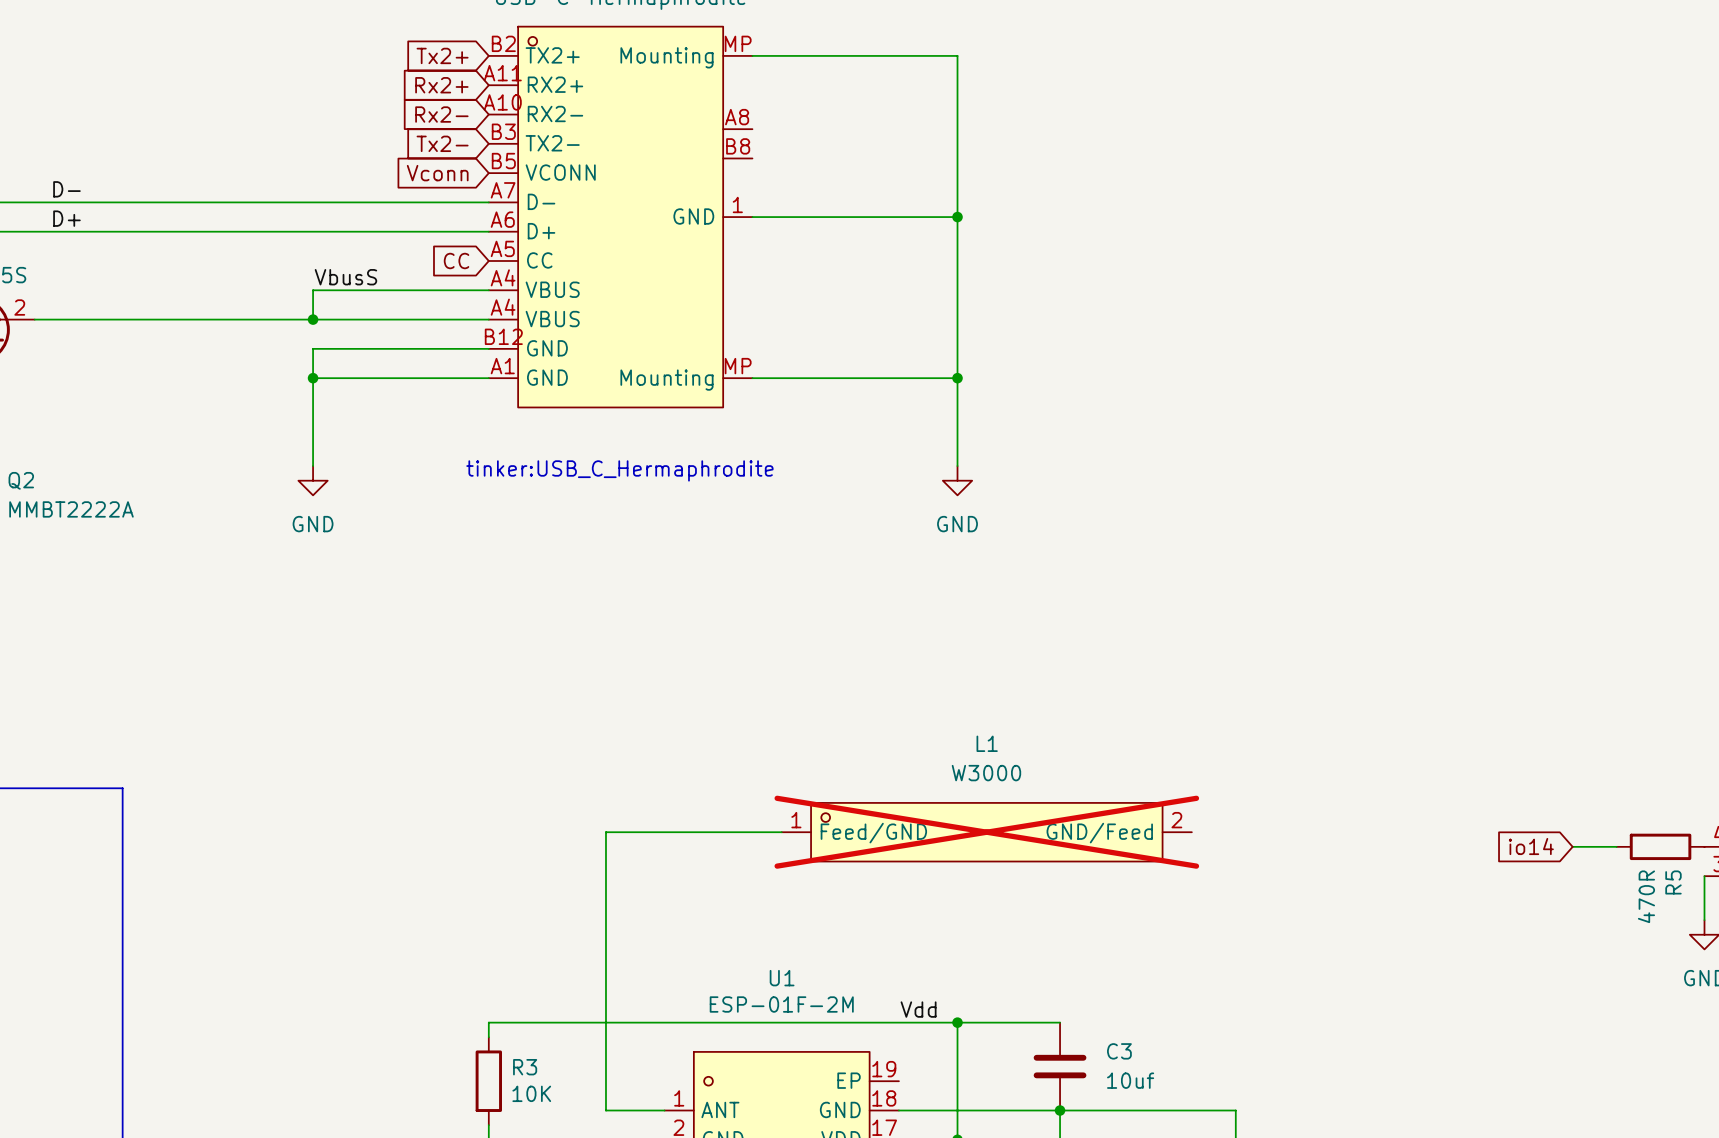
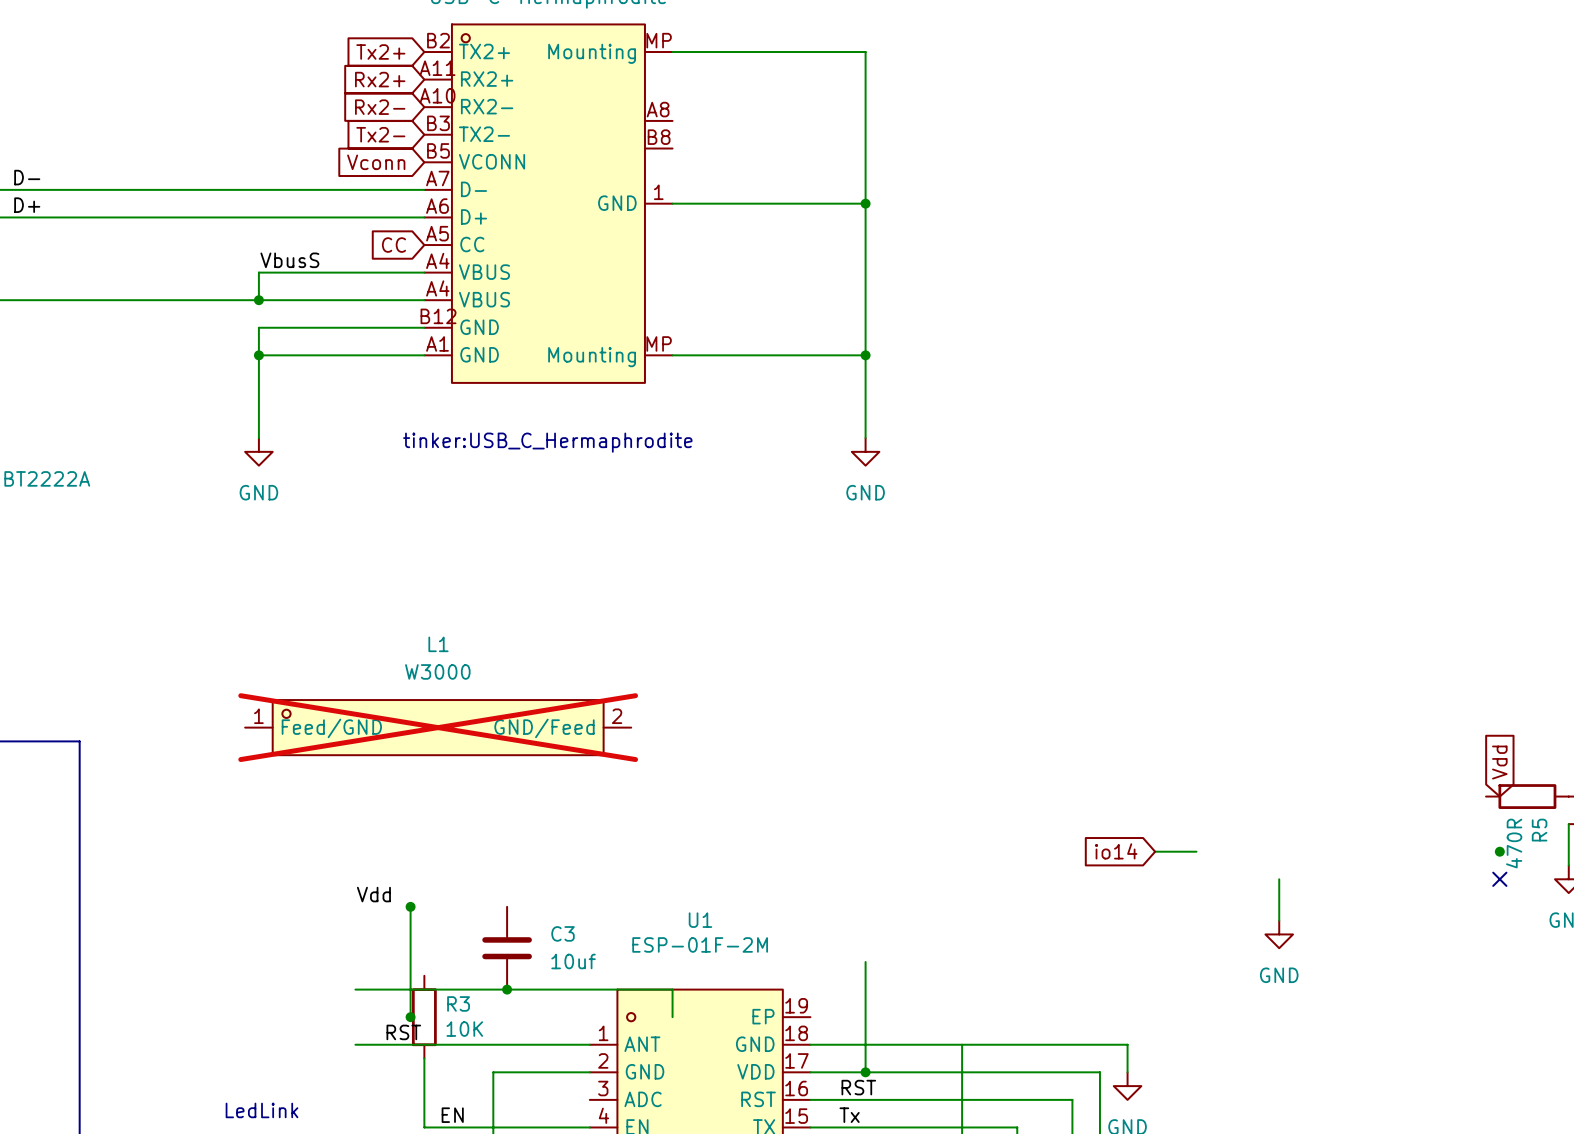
global label: none -> Vdd (1499, 762)
wire: (781, 832) (605, 832) (605, 1110) -> (355, 1044) (534, 1044)
L1 position: (986, 832) -> (438, 727)
global label: io14 (1531, 846) -> none
wire: (1572, 846) (1616, 846) -> none
global label: none -> io14 (1116, 851)
wire: none -> (1155, 851) (1196, 851)
junction: none -> (1499, 851)
wire: none -> (1279, 879) (1279, 920)
no-connect mark: none -> (1499, 879)
label: none -> Vdd (373, 894)
wire: none -> (410, 906) (410, 1017)
junction: none -> (410, 906)
power symbol: none -> GND (1279, 934)
label: Vdd (918, 1009) -> none
junction: (957, 1022) -> none
wire: (1060, 1022) (488, 1022) (488, 1037) -> none
wire: none -> (355, 989) (672, 989) (672, 1017)
junction: none -> (507, 989)
C3 position: (1060, 1066) -> (507, 948)
junction: none -> (410, 1017)
label: none -> RST (403, 1032)
junction: (1060, 1110) -> none

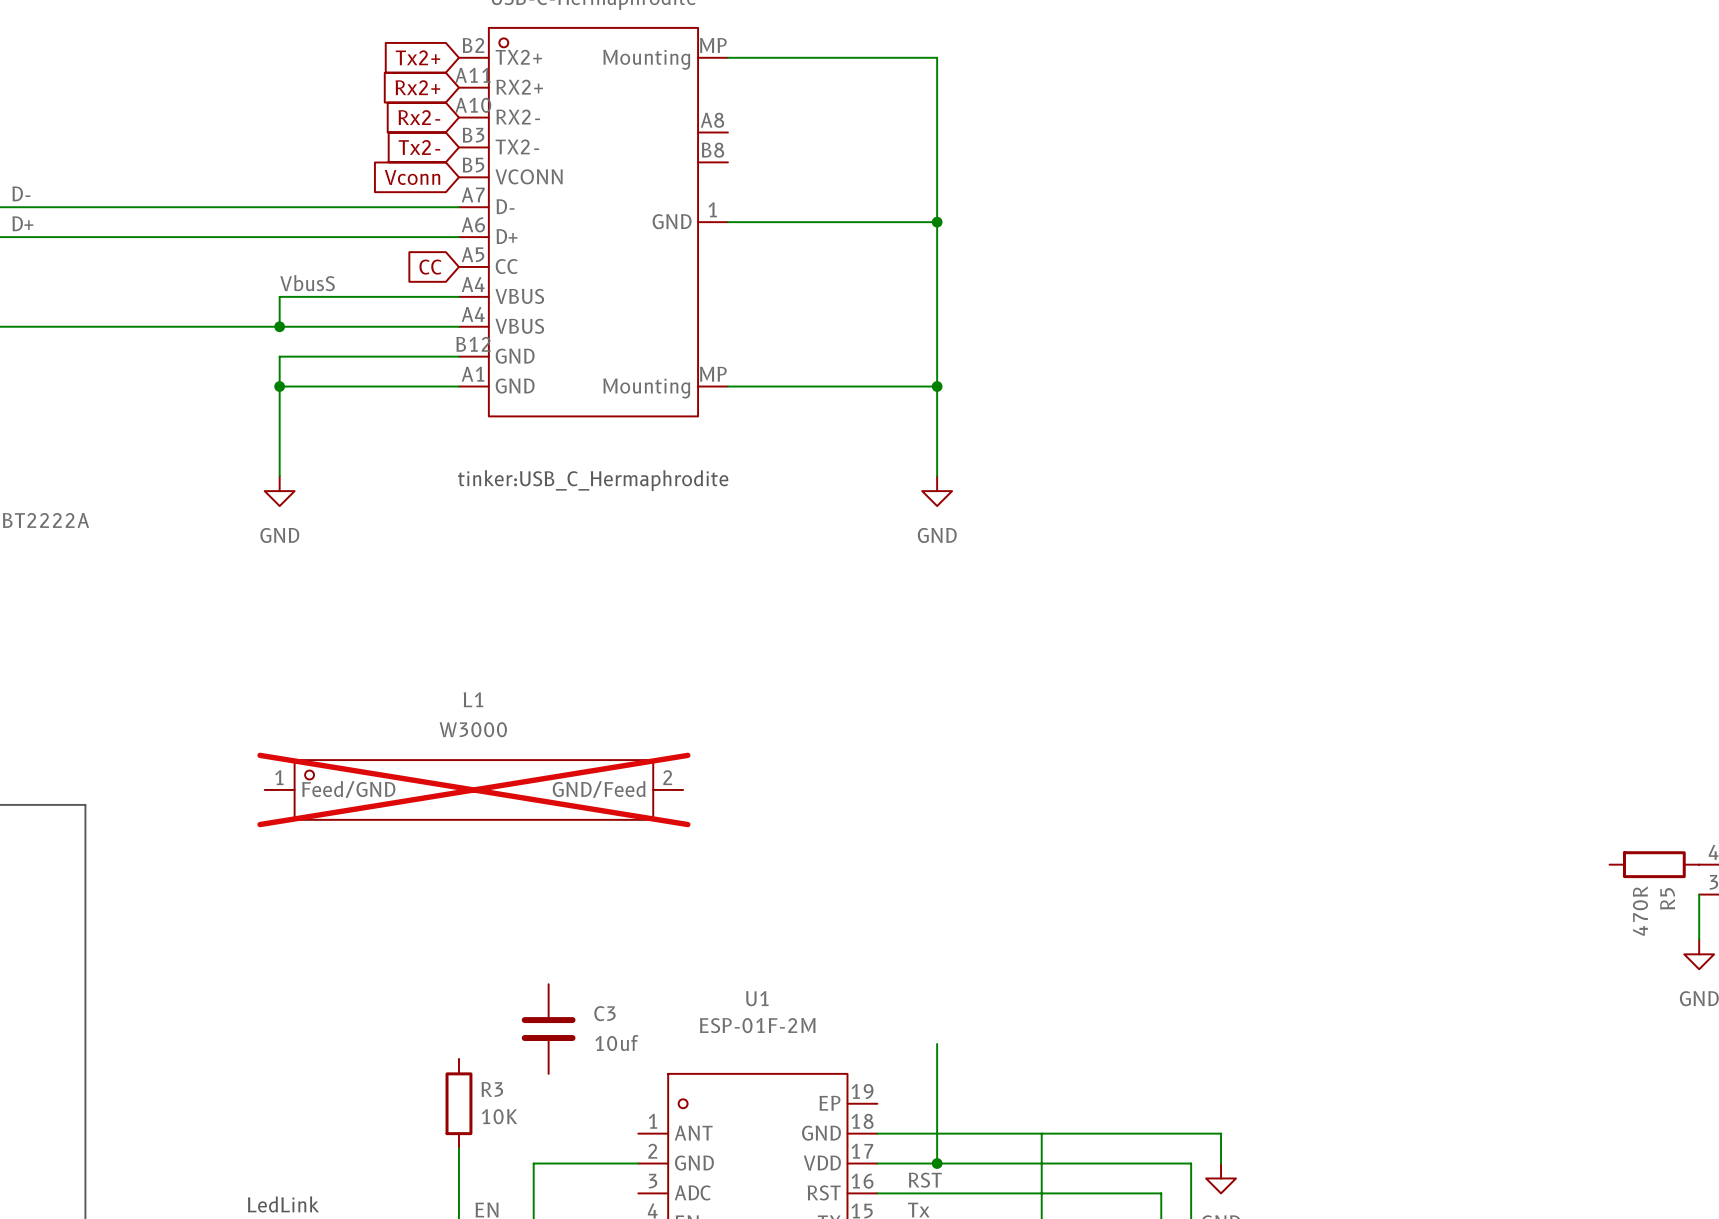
global label: Vdd (1499, 762) -> none
global label: io14 (1116, 851) -> none
wire: (1155, 851) (1196, 851) -> none
junction: (1499, 851) -> none
wire: (1279, 879) (1279, 920) -> none
no-connect mark: (1499, 879) -> none
label: Vdd (373, 894) -> none
wire: (410, 906) (410, 1017) -> none
junction: (410, 906) -> none
power symbol: GND (1279, 934) -> none
wire: (355, 989) (672, 989) (672, 1017) -> none
junction: (507, 989) -> none
junction: (410, 1017) -> none
label: RST (403, 1032) -> none
wire: (355, 1044) (589, 1044) -> none

